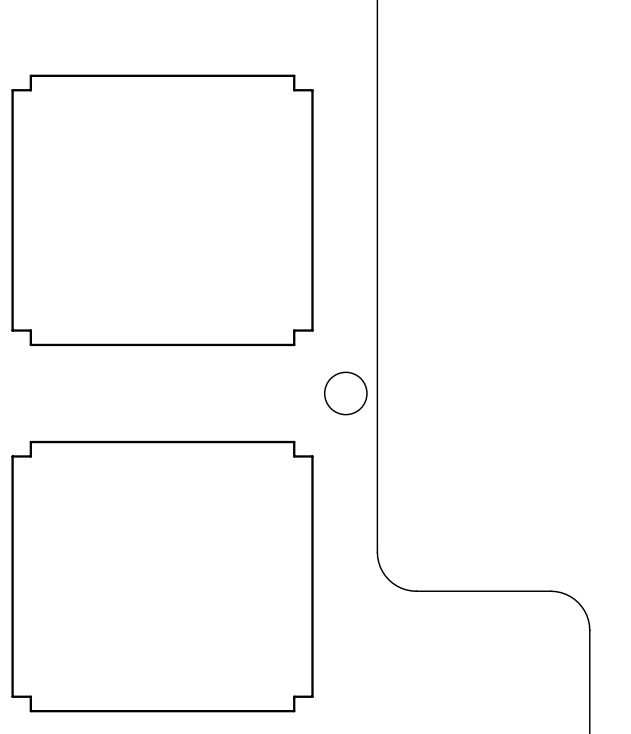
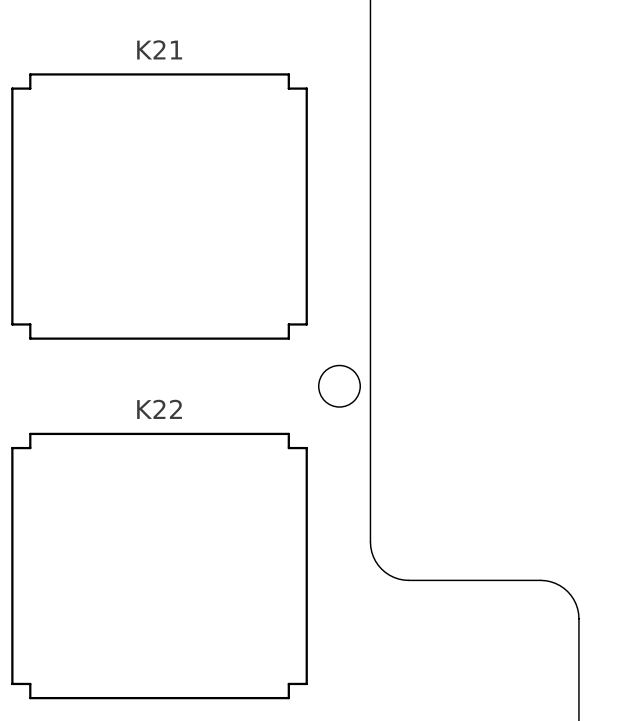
K21: none -> (159, 206)
K22: none -> (159, 566)

